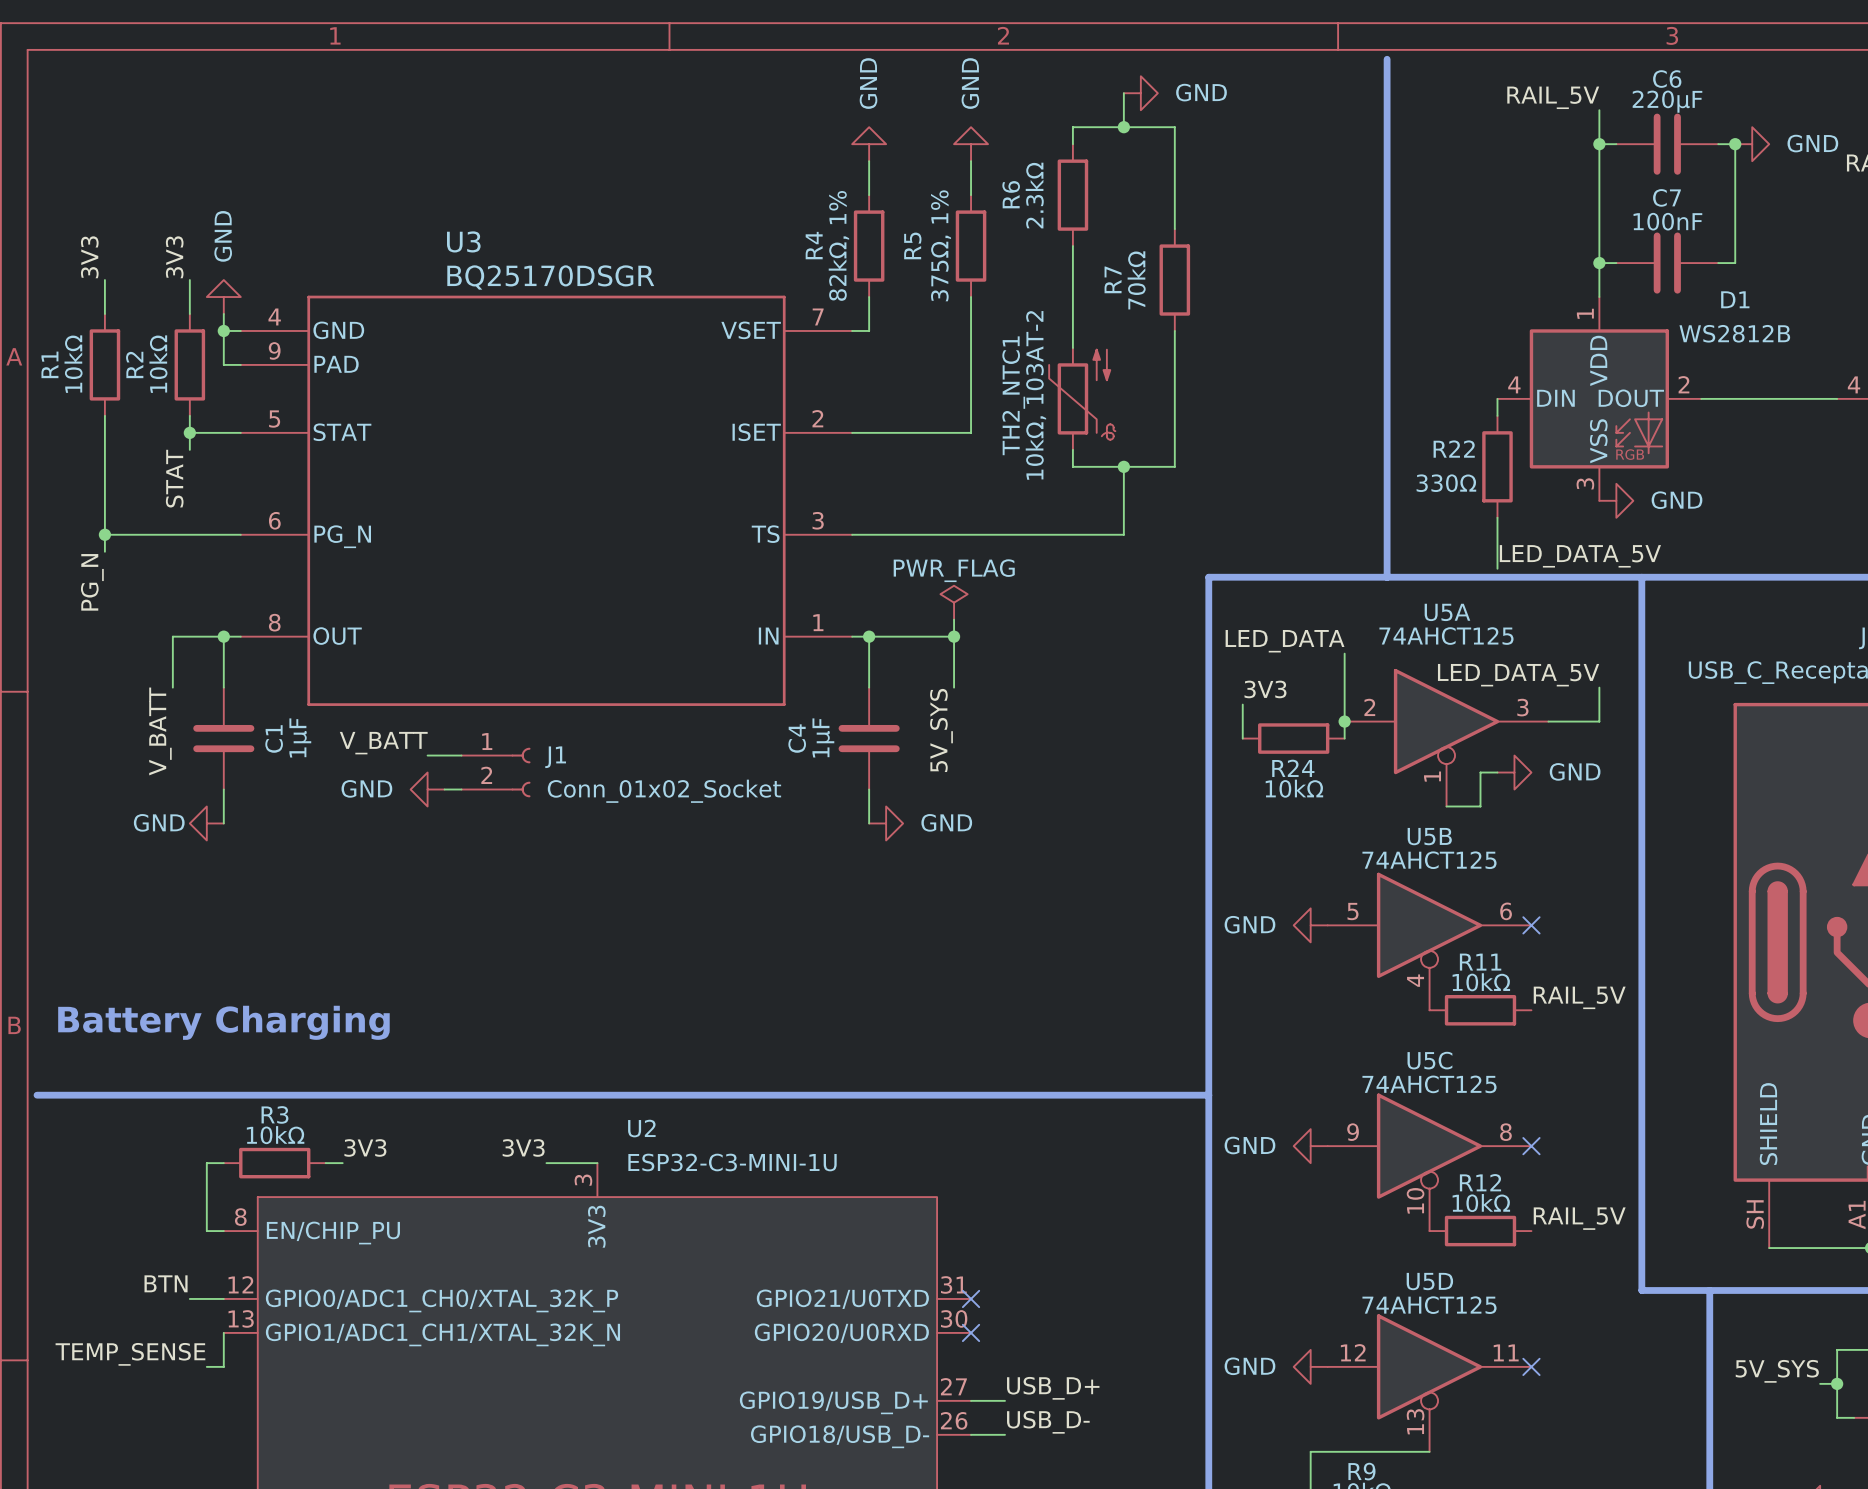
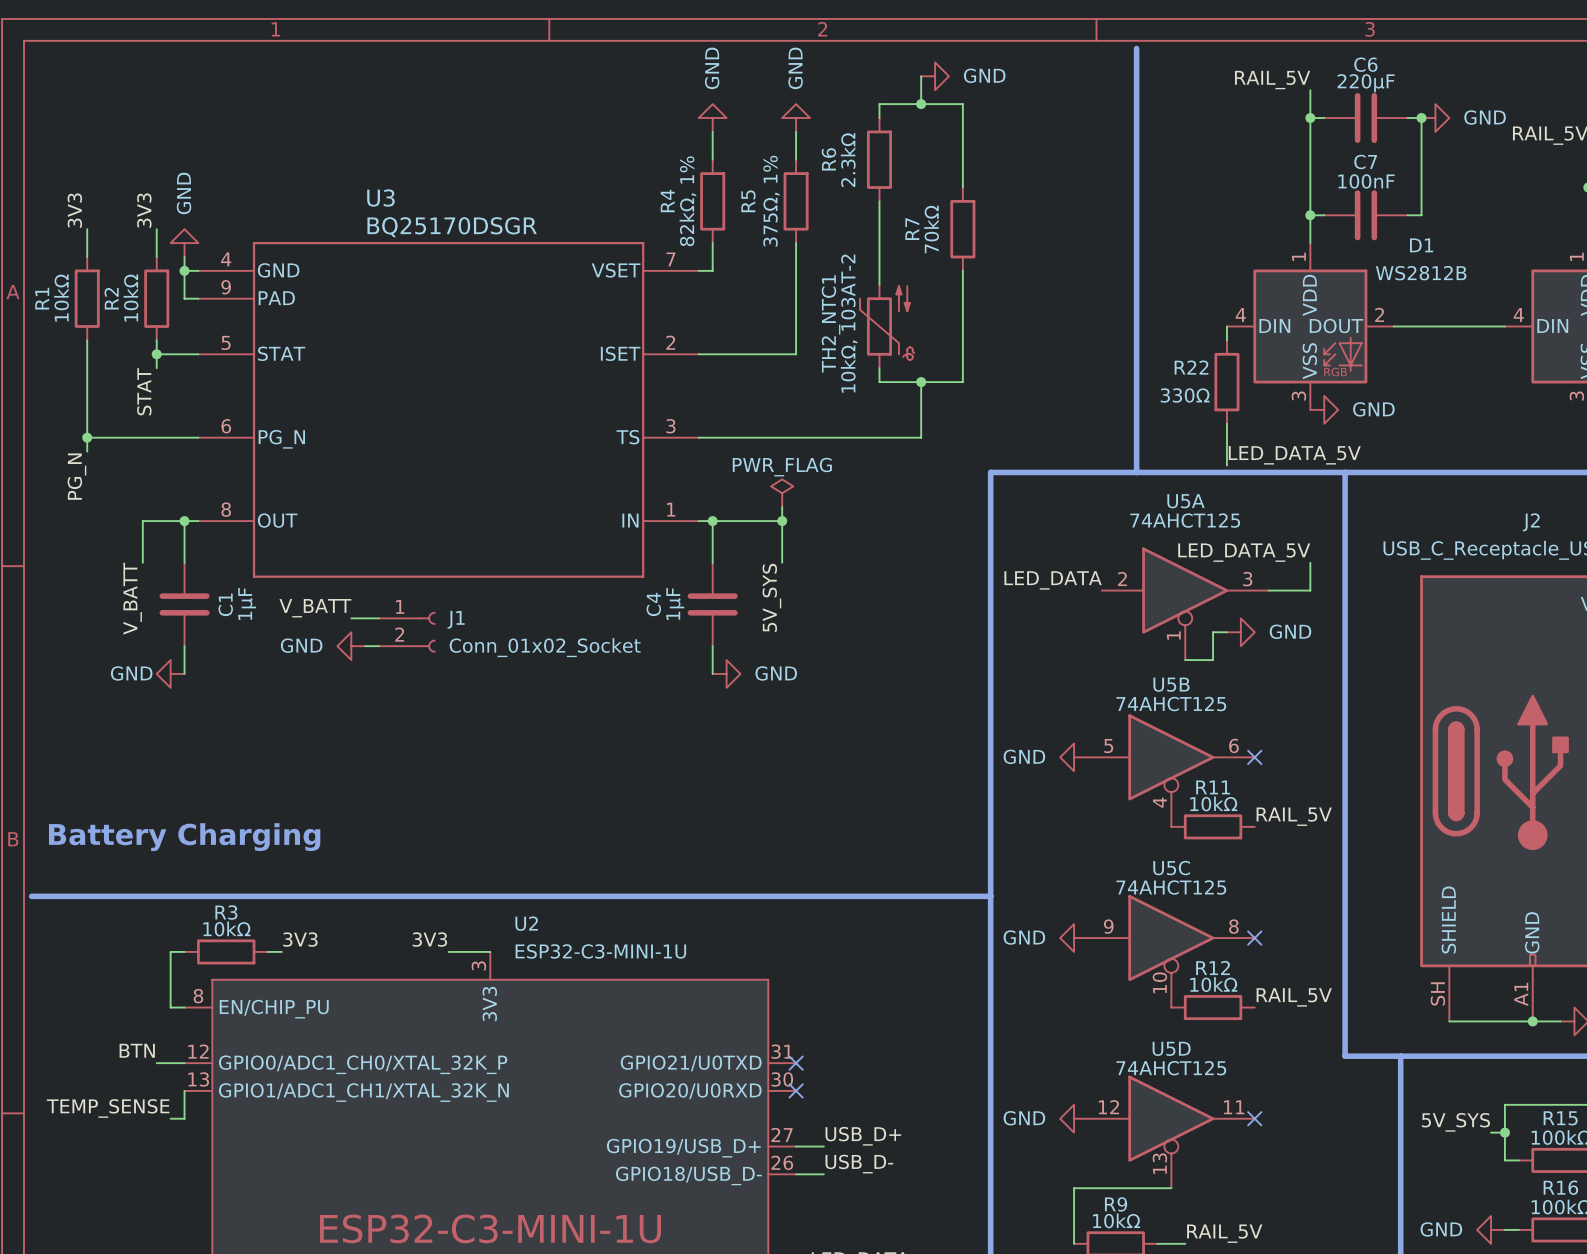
label position: LED_DATA (1285, 641) -> LED_DATA (1053, 580)
wire: (1344, 653) (1344, 738) -> none
label: 3V3 (1265, 689) -> none
wire: (1242, 704) (1242, 738) -> none
junction: (1344, 721) -> none
R24: 10kΩ (1293, 738) -> none

